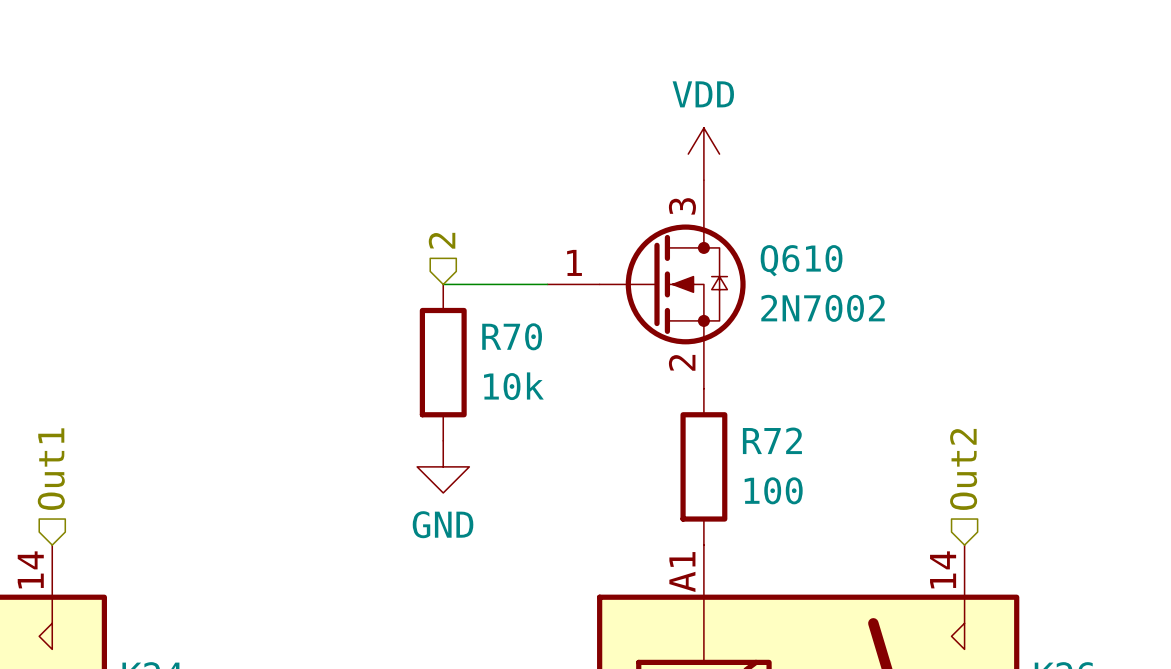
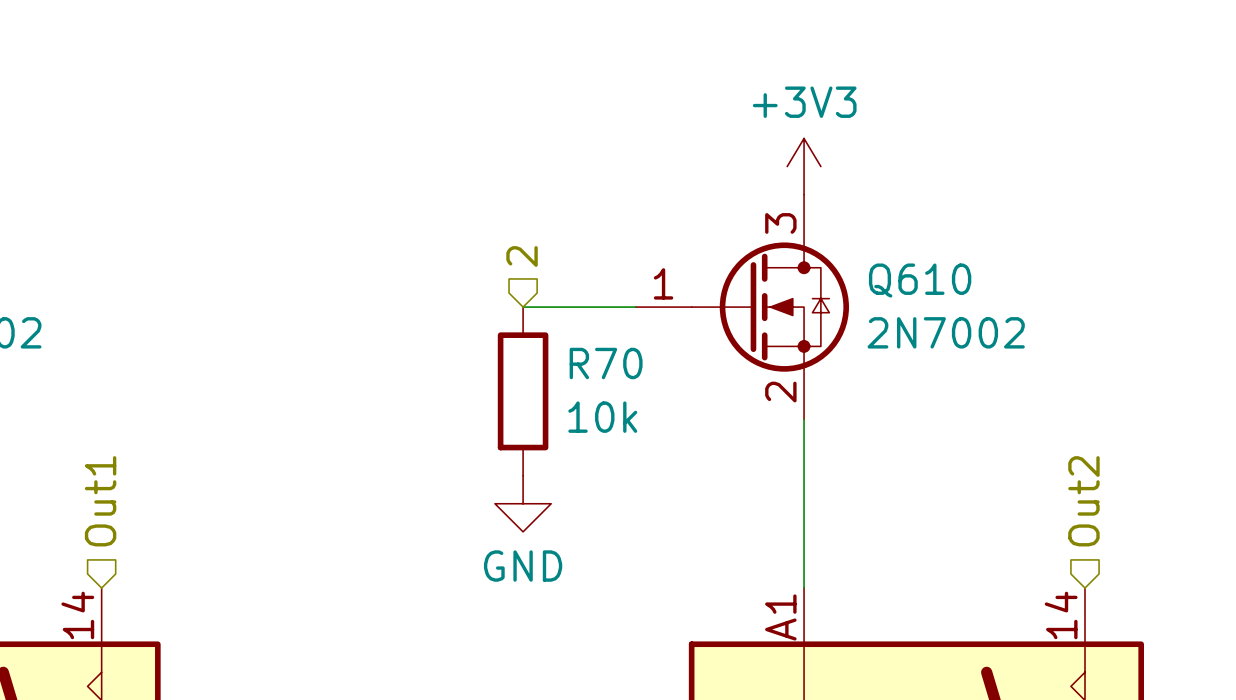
power symbol: VDD (703, 154) -> +3V3 (804, 166)
wire: none -> (804, 419) (804, 588)
R72: 100 (703, 466) -> none

